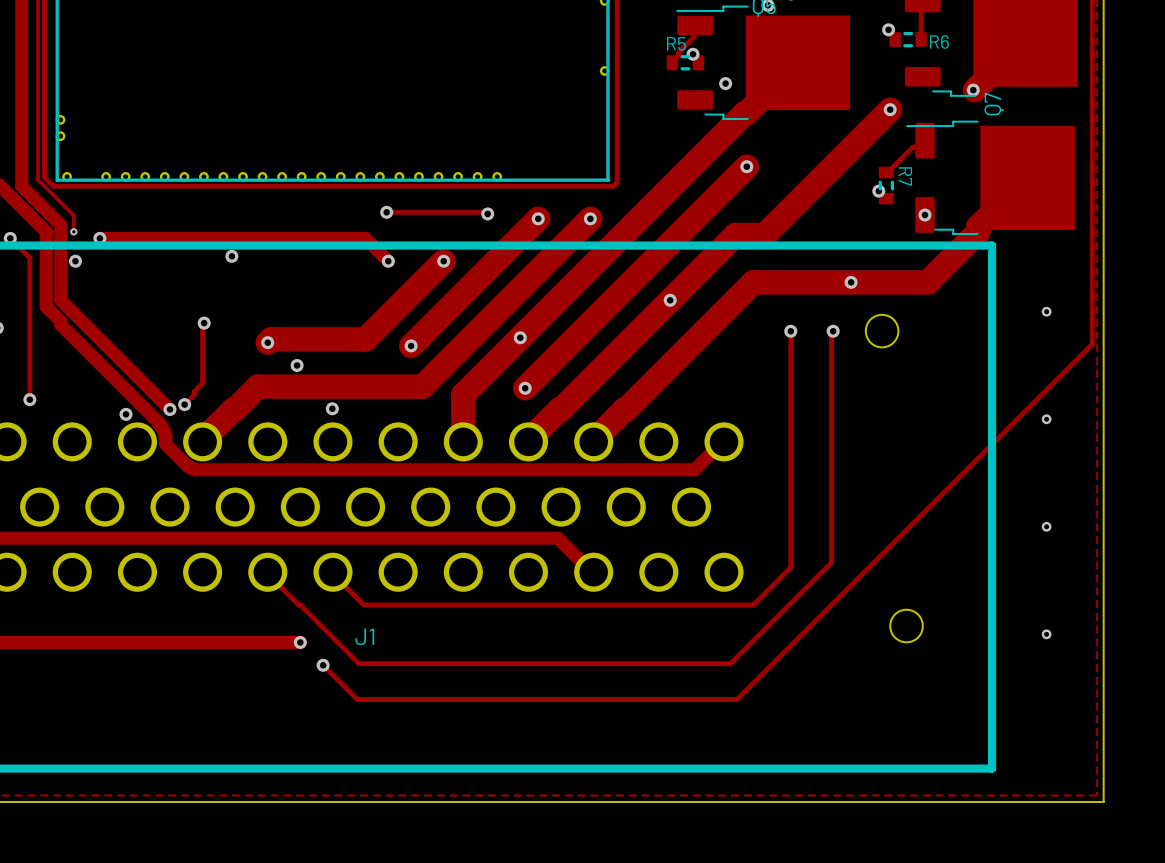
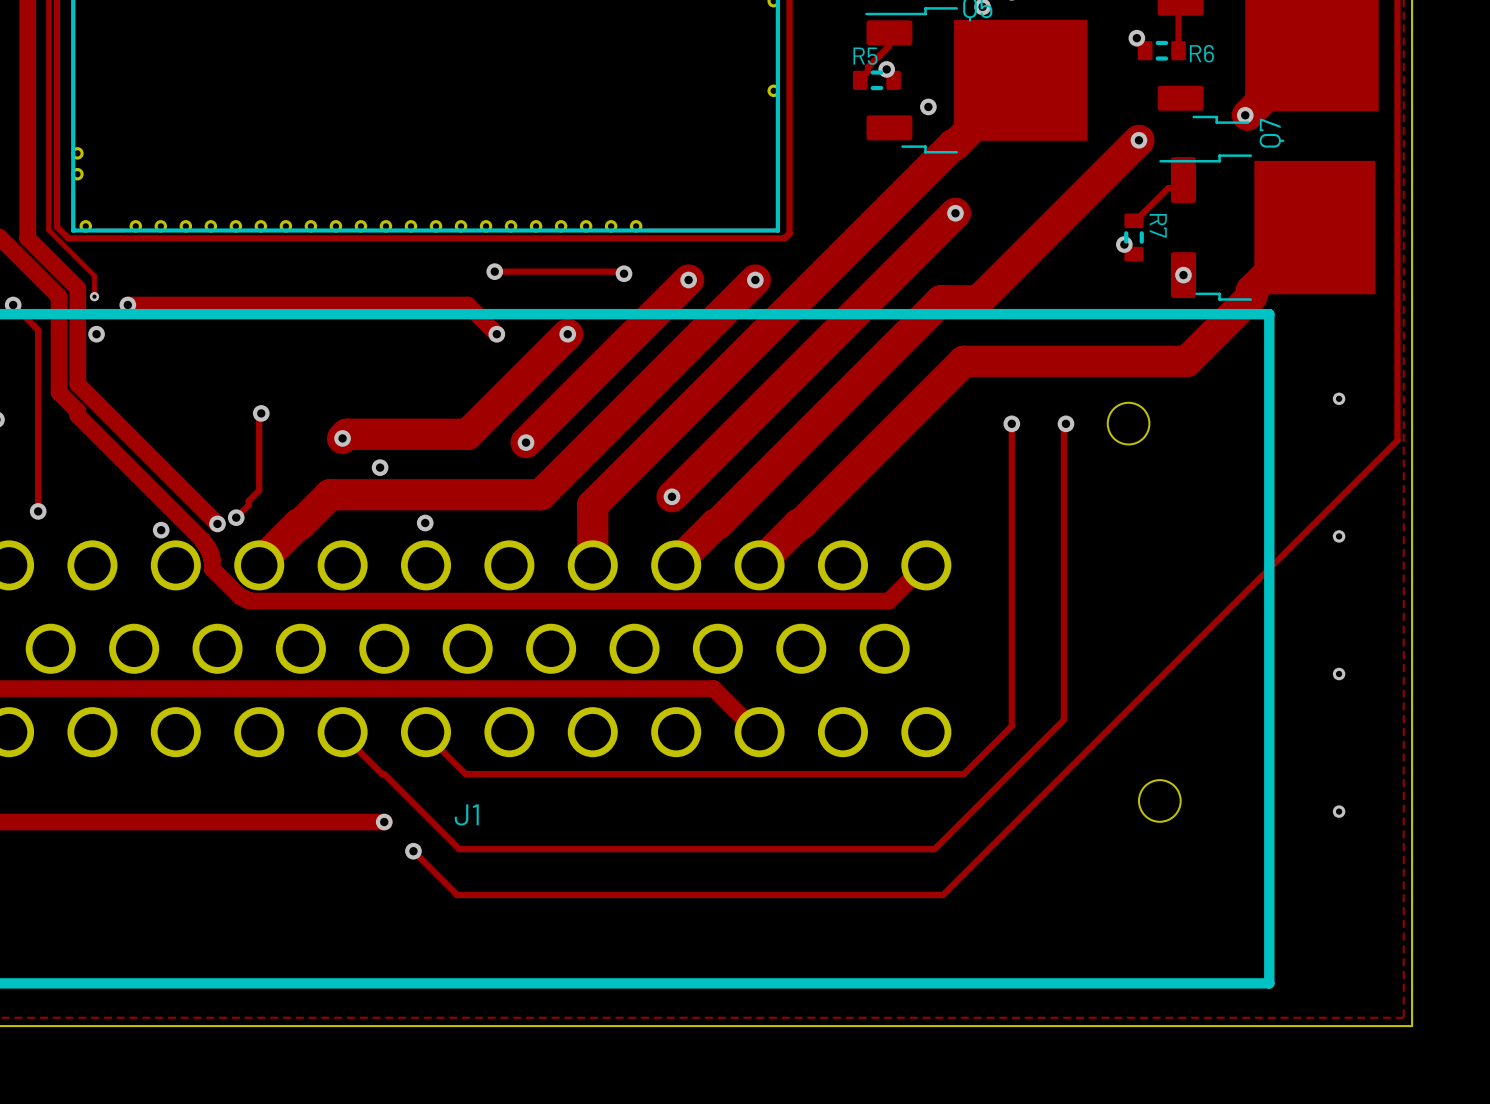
via: (231, 256) -> none
via: (851, 282) -> none
via: (670, 300) -> none
via: (520, 337) -> none

